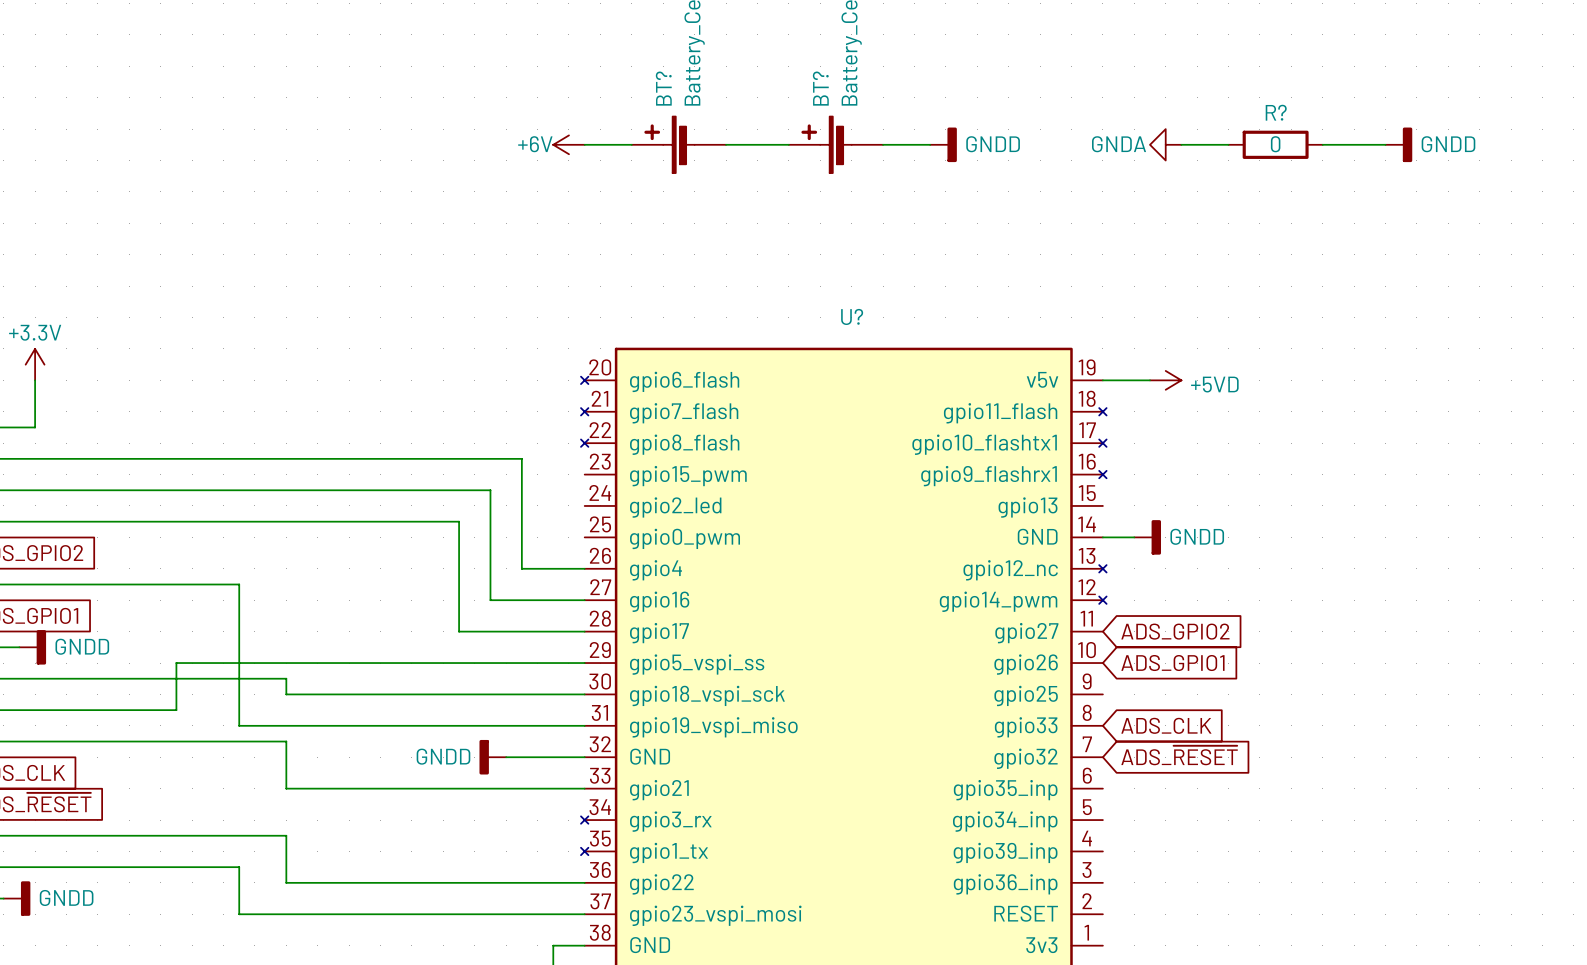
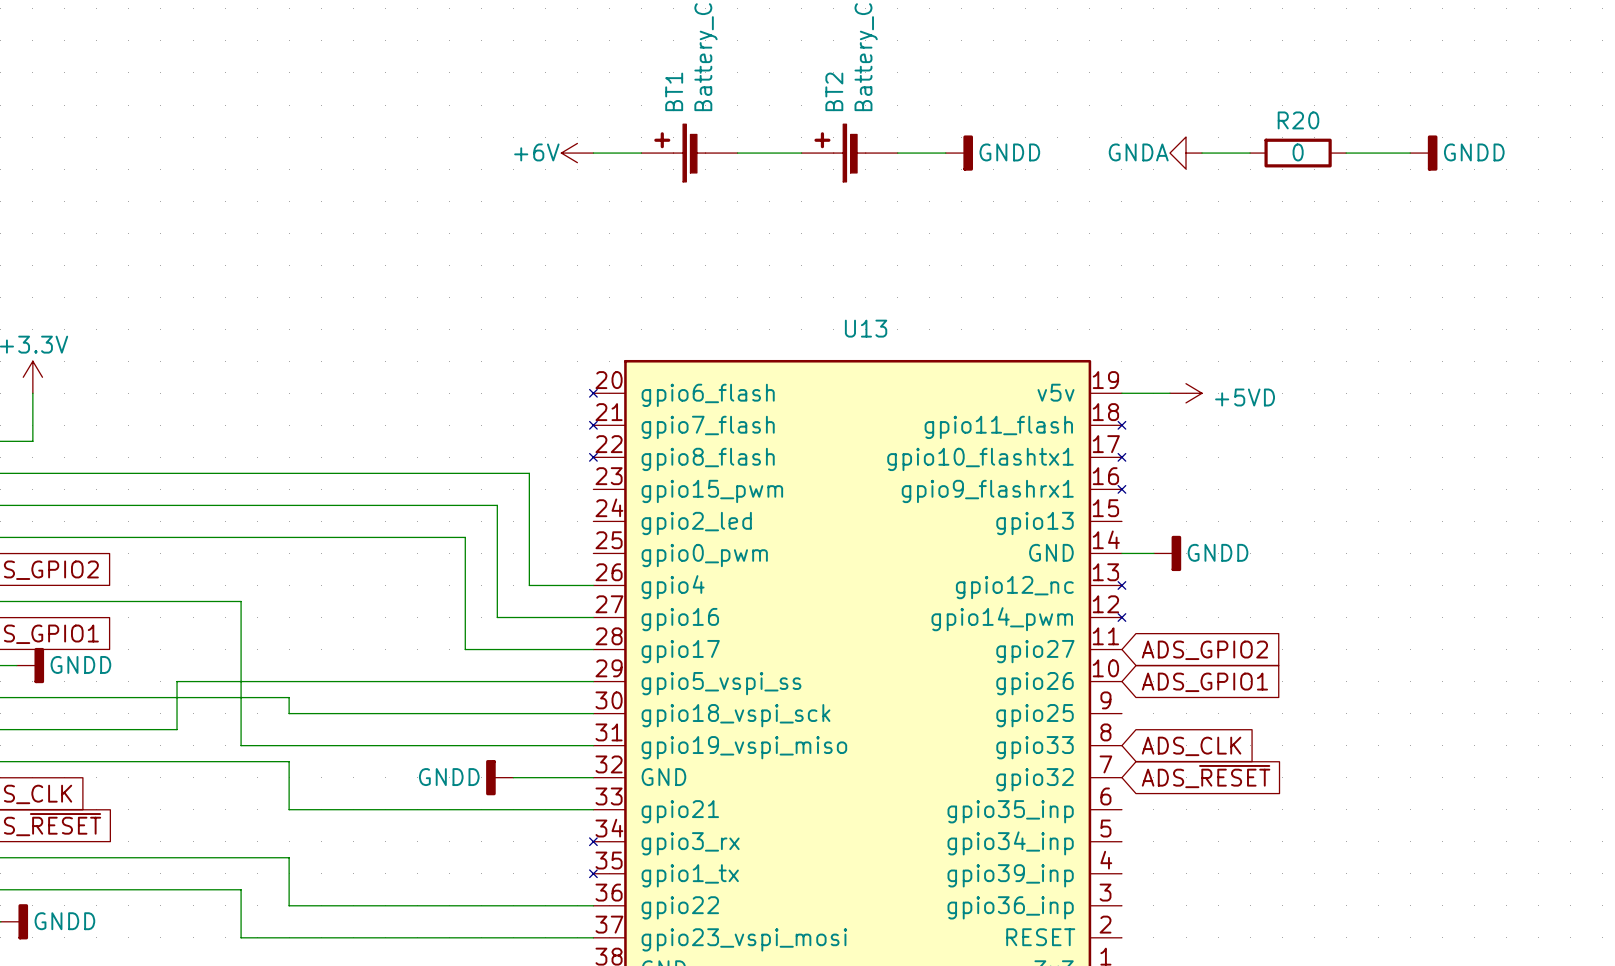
BT? name: BT? (663, 88) -> BT1 (674, 91)
BT? name: BT? (820, 88) -> BT2 (834, 91)
R? name: R? (1276, 112) -> R20 (1298, 120)
U? name: U? (852, 316) -> U13 (866, 328)

